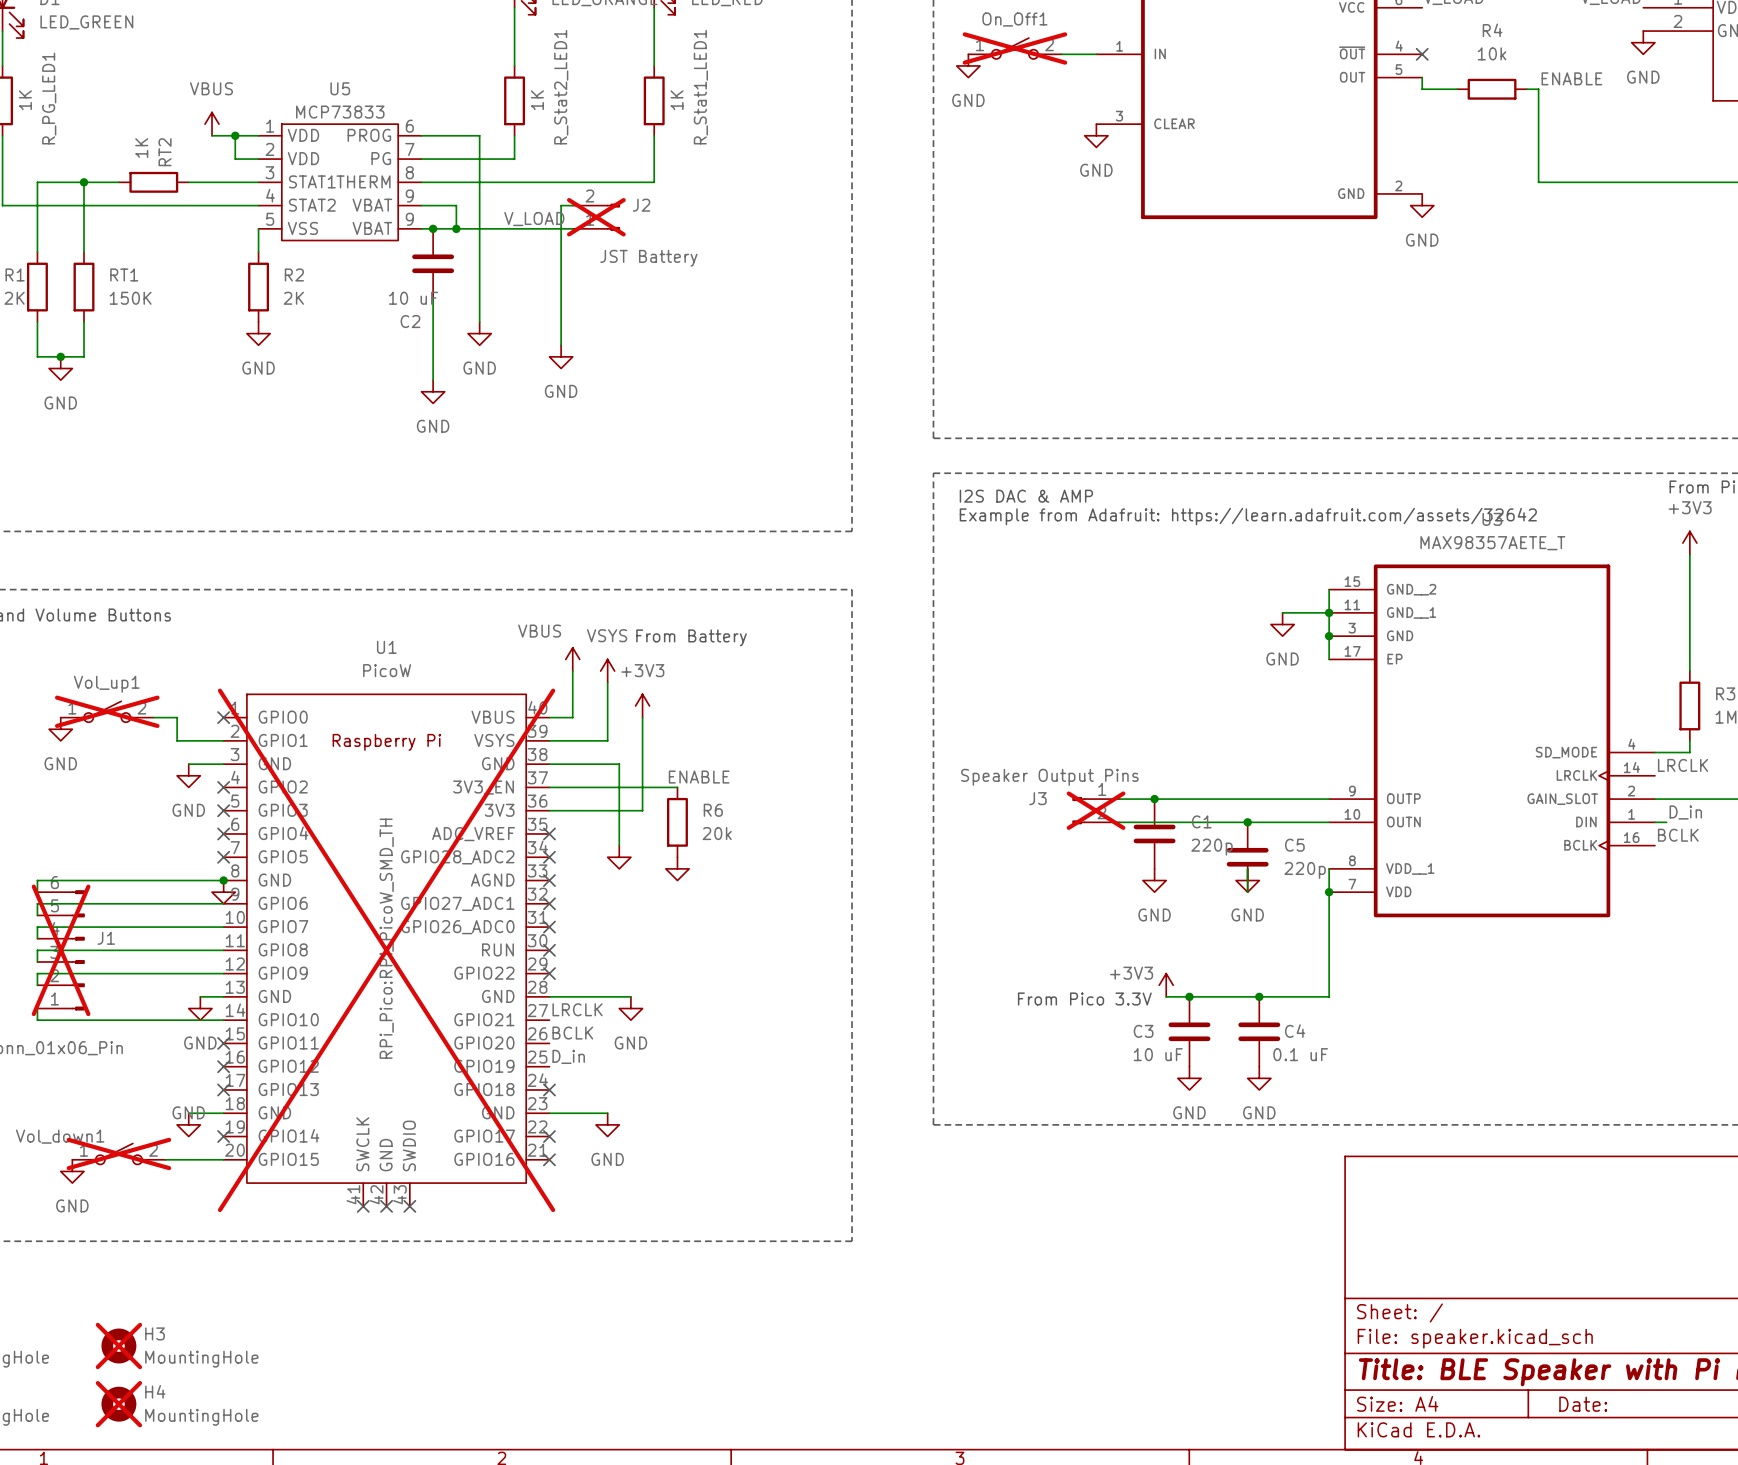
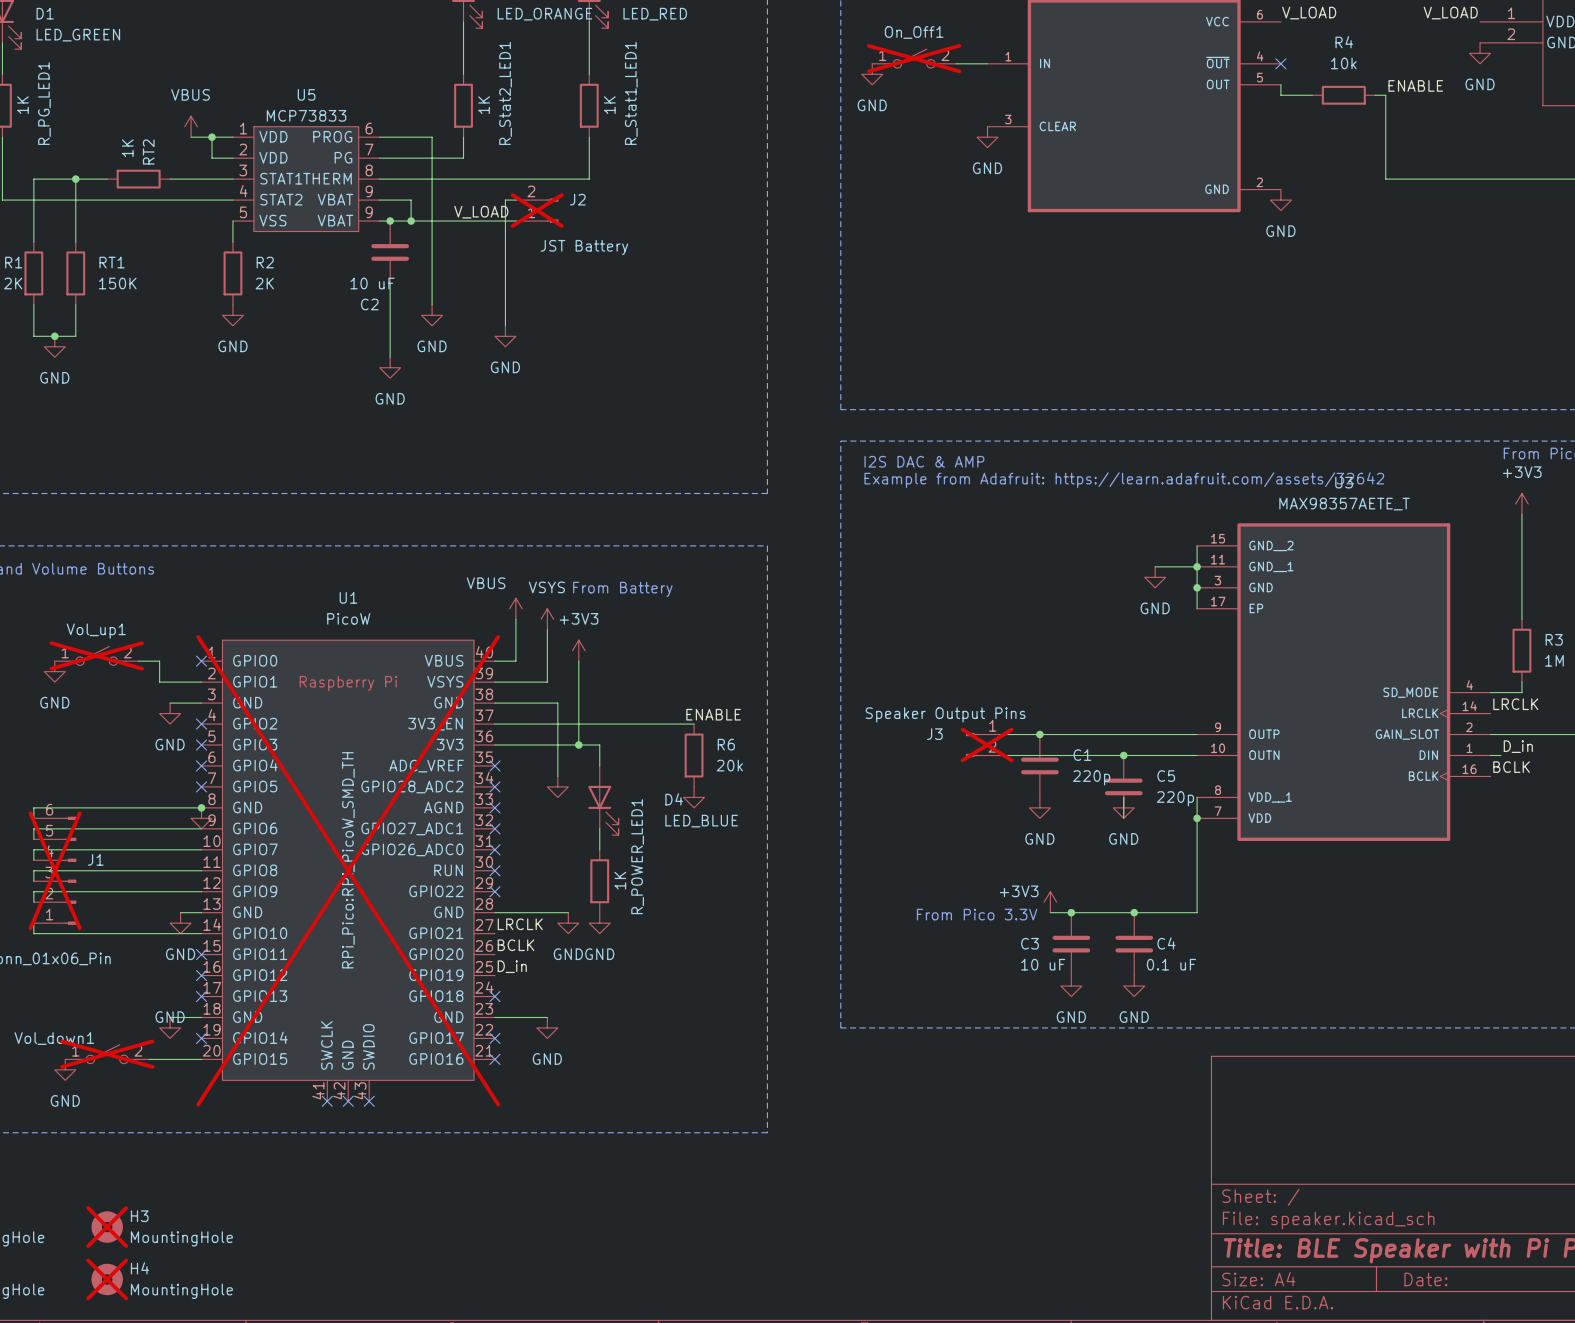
label position: ENABLE (699, 777) -> ENABLE (713, 714)
wire: none -> (610, 724) (694, 724)
wire: none -> (578, 745) (599, 745) (599, 765)
junction: none -> (578, 745)
R6 position: (677, 822) -> (694, 755)
power symbol position: (677, 868) -> (694, 797)
D4: none -> LED_BLUE (603, 800)
wire: none -> (599, 828) (599, 849)
R_POWER_LED1: none -> 1K (599, 881)
power symbol: none -> GND (599, 923)

